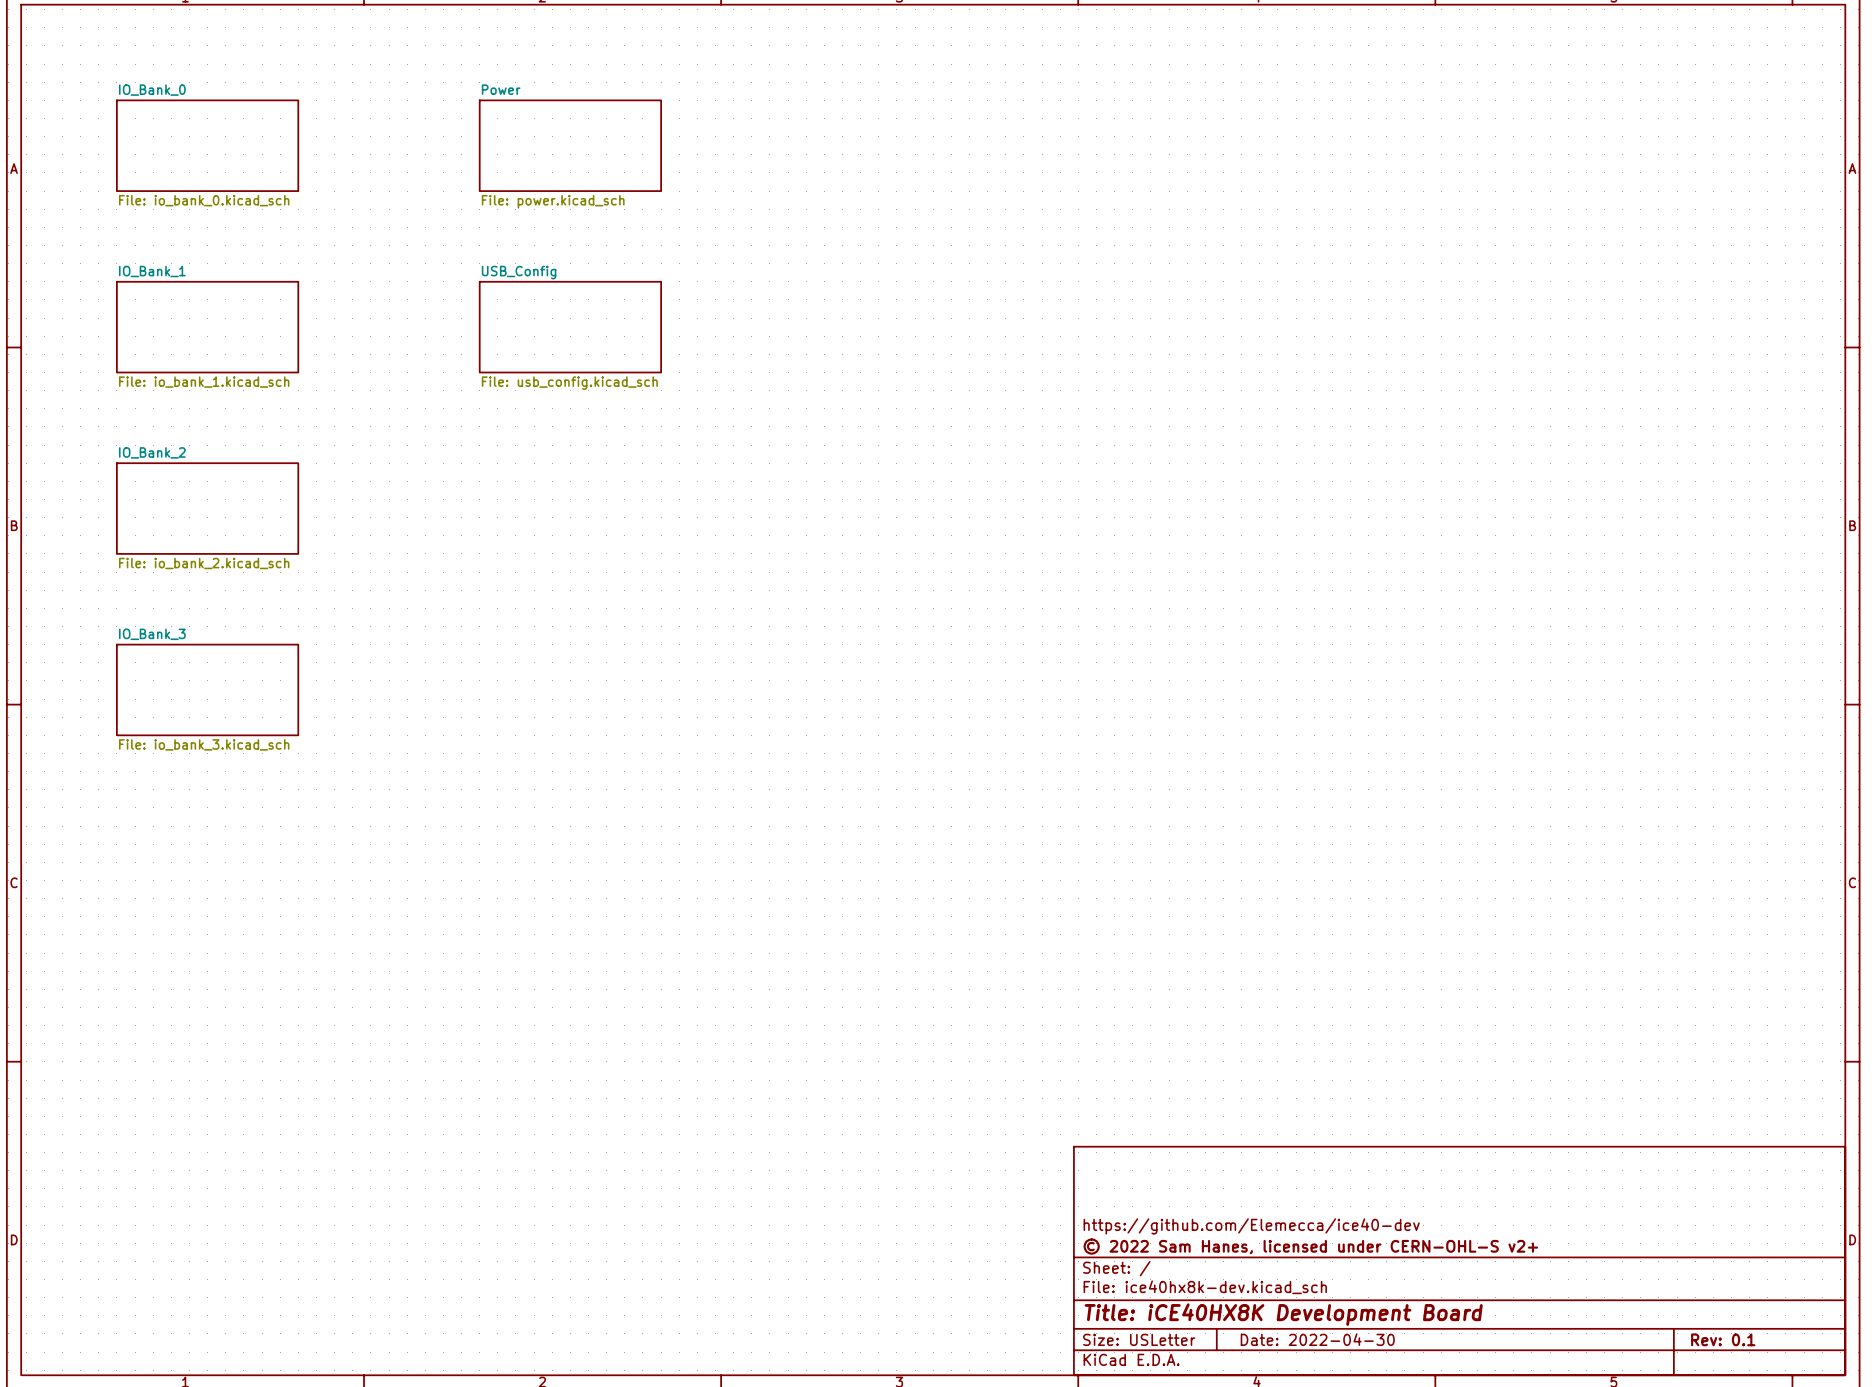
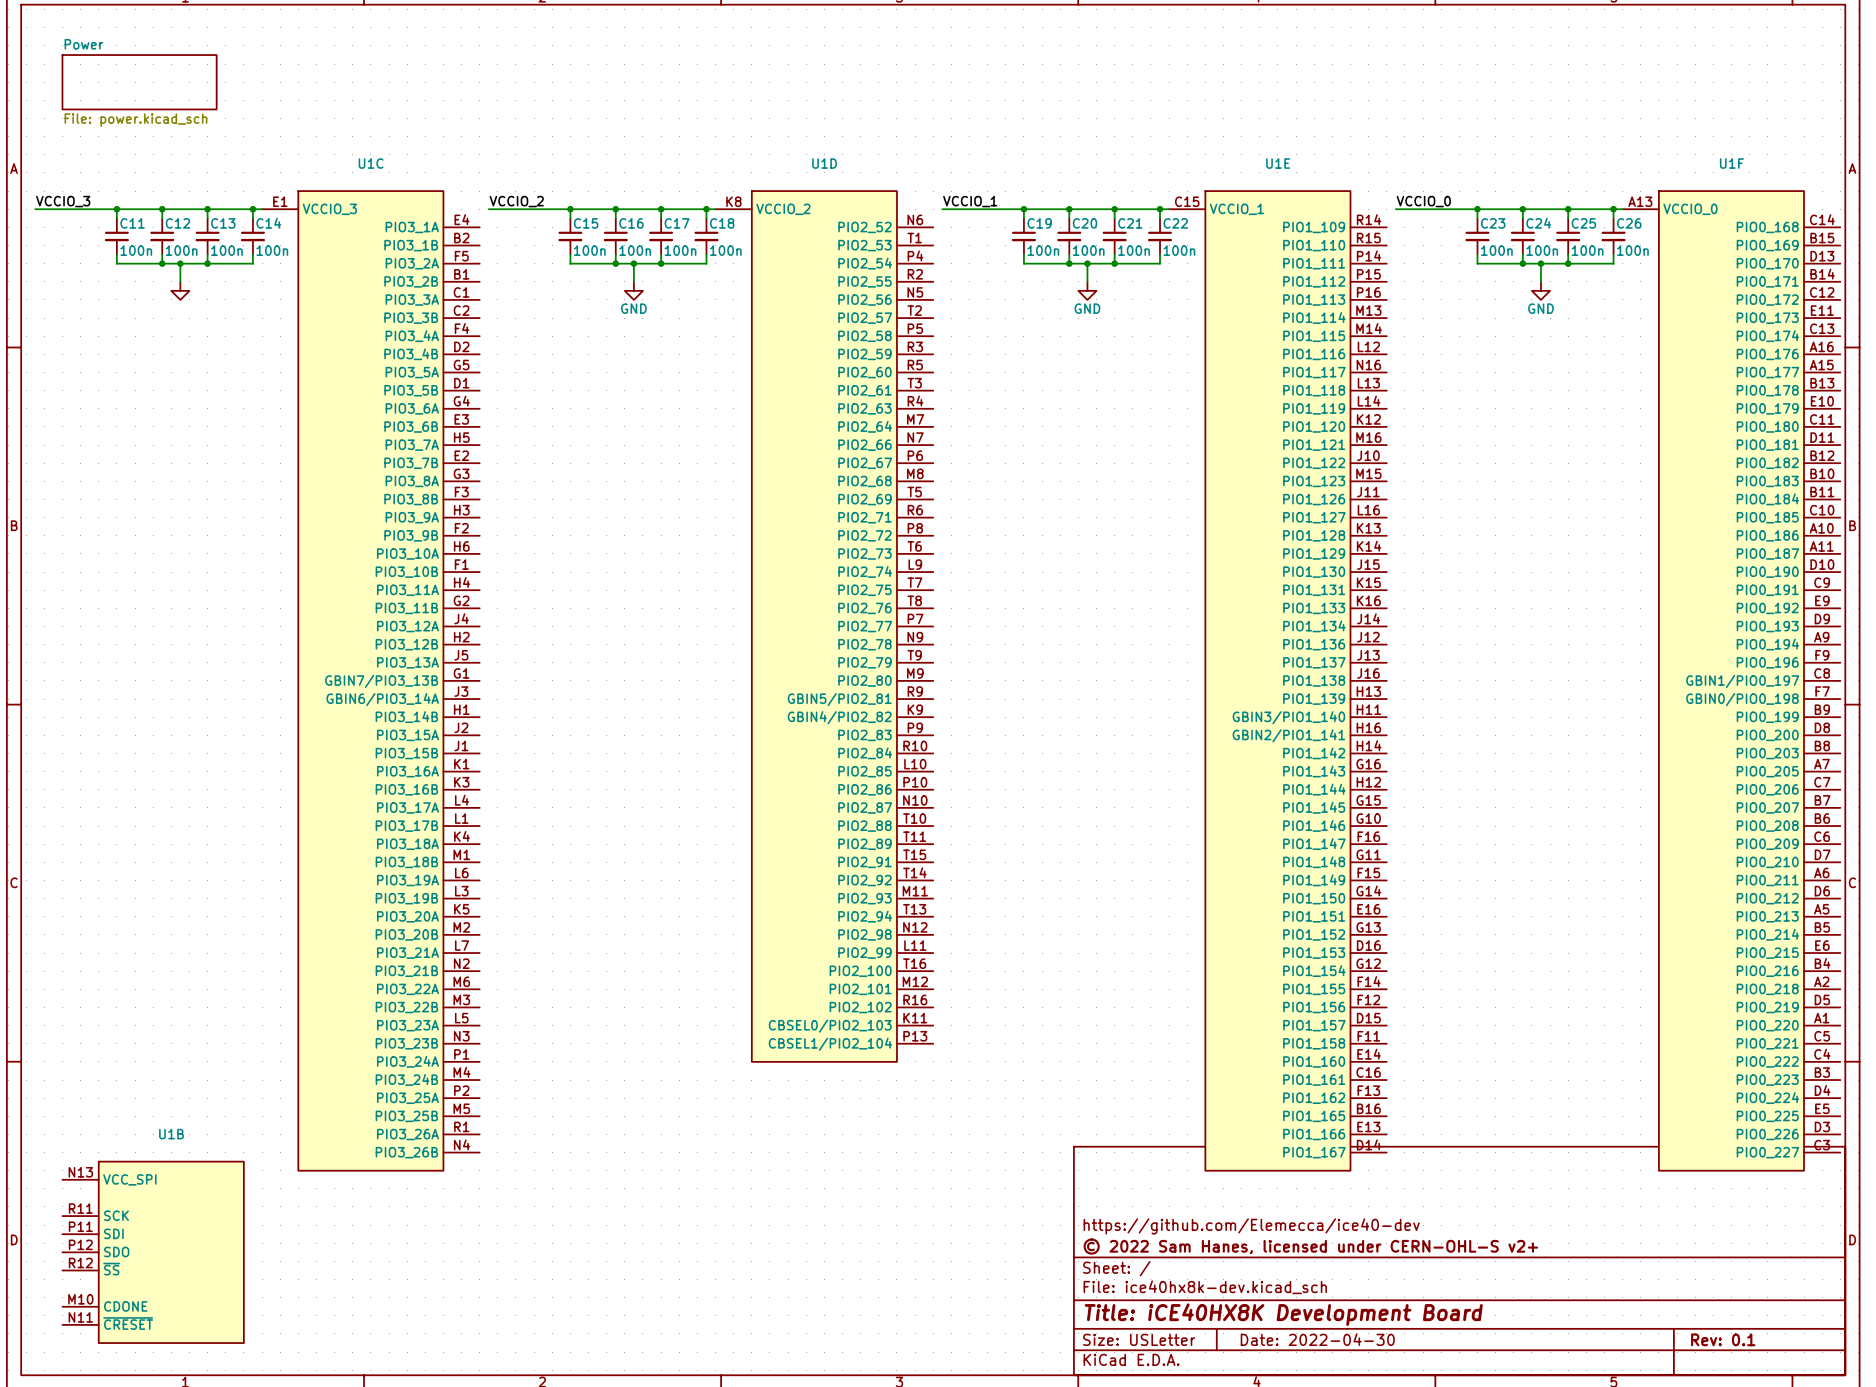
sheet Power: none -> File: power.kicad_sch (139, 82)
sheet IO_Bank_0: File: io_bank_0.kicad_sch (207, 145) -> none
sheet Power: File: power.kicad_sch (570, 145) -> none
label: none -> VCCIO_3 (63, 201)
label: none -> VCCIO_2 (516, 201)
label: none -> VCCIO_1 (970, 201)
label: none -> VCCIO_0 (1423, 201)
wire: none -> (35, 209) (262, 209)
wire: none -> (116, 209) (116, 218)
junction: none -> (116, 209)
wire: none -> (162, 209) (162, 218)
junction: none -> (162, 209)
wire: none -> (207, 209) (207, 218)
junction: none -> (207, 209)
wire: none -> (252, 209) (252, 218)
junction: none -> (252, 209)
wire: none -> (488, 209) (715, 209)
wire: none -> (570, 209) (570, 218)
junction: none -> (570, 209)
wire: none -> (615, 209) (615, 218)
junction: none -> (615, 209)
wire: none -> (661, 209) (661, 218)
junction: none -> (661, 209)
wire: none -> (706, 209) (706, 218)
junction: none -> (706, 209)
wire: none -> (942, 209) (1169, 209)
wire: none -> (1023, 209) (1023, 218)
junction: none -> (1023, 209)
wire: none -> (1069, 209) (1069, 218)
junction: none -> (1069, 209)
wire: none -> (1114, 209) (1114, 218)
junction: none -> (1114, 209)
wire: none -> (1160, 209) (1160, 218)
junction: none -> (1160, 209)
wire: none -> (1395, 209) (1622, 209)
wire: none -> (1477, 209) (1477, 218)
junction: none -> (1477, 209)
wire: none -> (1522, 209) (1522, 218)
junction: none -> (1522, 209)
wire: none -> (1568, 209) (1568, 218)
junction: none -> (1568, 209)
wire: none -> (1613, 209) (1613, 218)
junction: none -> (1613, 209)
C11: none -> 100n (116, 236)
C12: none -> 100n (162, 236)
C13: none -> 100n (207, 236)
C14: none -> 100n (252, 236)
C15: none -> 100n (570, 236)
C16: none -> 100n (615, 236)
C17: none -> 100n (661, 236)
C18: none -> 100n (706, 236)
C19: none -> 100n (1023, 236)
C20: none -> 100n (1069, 236)
C21: none -> 100n (1114, 236)
C22: none -> 100n (1160, 236)
C23: none -> 100n (1477, 236)
C24: none -> 100n (1522, 236)
C25: none -> 100n (1568, 236)
C26: none -> 100n (1613, 236)
wire: none -> (116, 254) (116, 263) (252, 263) (252, 254)
wire: none -> (162, 254) (162, 263)
wire: none -> (207, 254) (207, 263)
wire: none -> (570, 254) (570, 263) (706, 263) (706, 254)
wire: none -> (615, 254) (615, 263)
wire: none -> (661, 254) (661, 263)
wire: none -> (1023, 254) (1023, 263) (1160, 263) (1160, 254)
wire: none -> (1069, 254) (1069, 263)
wire: none -> (1114, 254) (1114, 263)
wire: none -> (1477, 254) (1477, 263) (1613, 263) (1613, 254)
wire: none -> (1522, 254) (1522, 263)
wire: none -> (1568, 254) (1568, 263)
junction: none -> (162, 263)
wire: none -> (180, 263) (180, 281)
junction: none -> (180, 263)
junction: none -> (207, 263)
junction: none -> (615, 263)
wire: none -> (633, 263) (633, 281)
junction: none -> (633, 263)
junction: none -> (661, 263)
junction: none -> (1069, 263)
wire: none -> (1087, 263) (1087, 281)
junction: none -> (1087, 263)
junction: none -> (1114, 263)
junction: none -> (1522, 263)
wire: none -> (1540, 263) (1540, 281)
junction: none -> (1540, 263)
junction: none -> (1568, 263)
power symbol: none -> (180, 290)
power symbol: none -> GND (633, 290)
power symbol: none -> GND (1087, 290)
power symbol: none -> GND (1540, 290)
sheet IO_Bank_1: File: io_bank_1.kicad_sch (207, 327) -> none
sheet USB_Config: File: usb_config.kicad_sch (570, 327) -> none
sheet IO_Bank_2: File: io_bank_2.kicad_sch (207, 508) -> none
U1D: none -> (824, 626)
U1C: none -> (370, 680)
U1E: none -> (1277, 680)
U1F: none -> (1731, 680)
sheet IO_Bank_3: File: io_bank_3.kicad_sch (207, 689) -> none
U1B: none -> (153, 1252)

